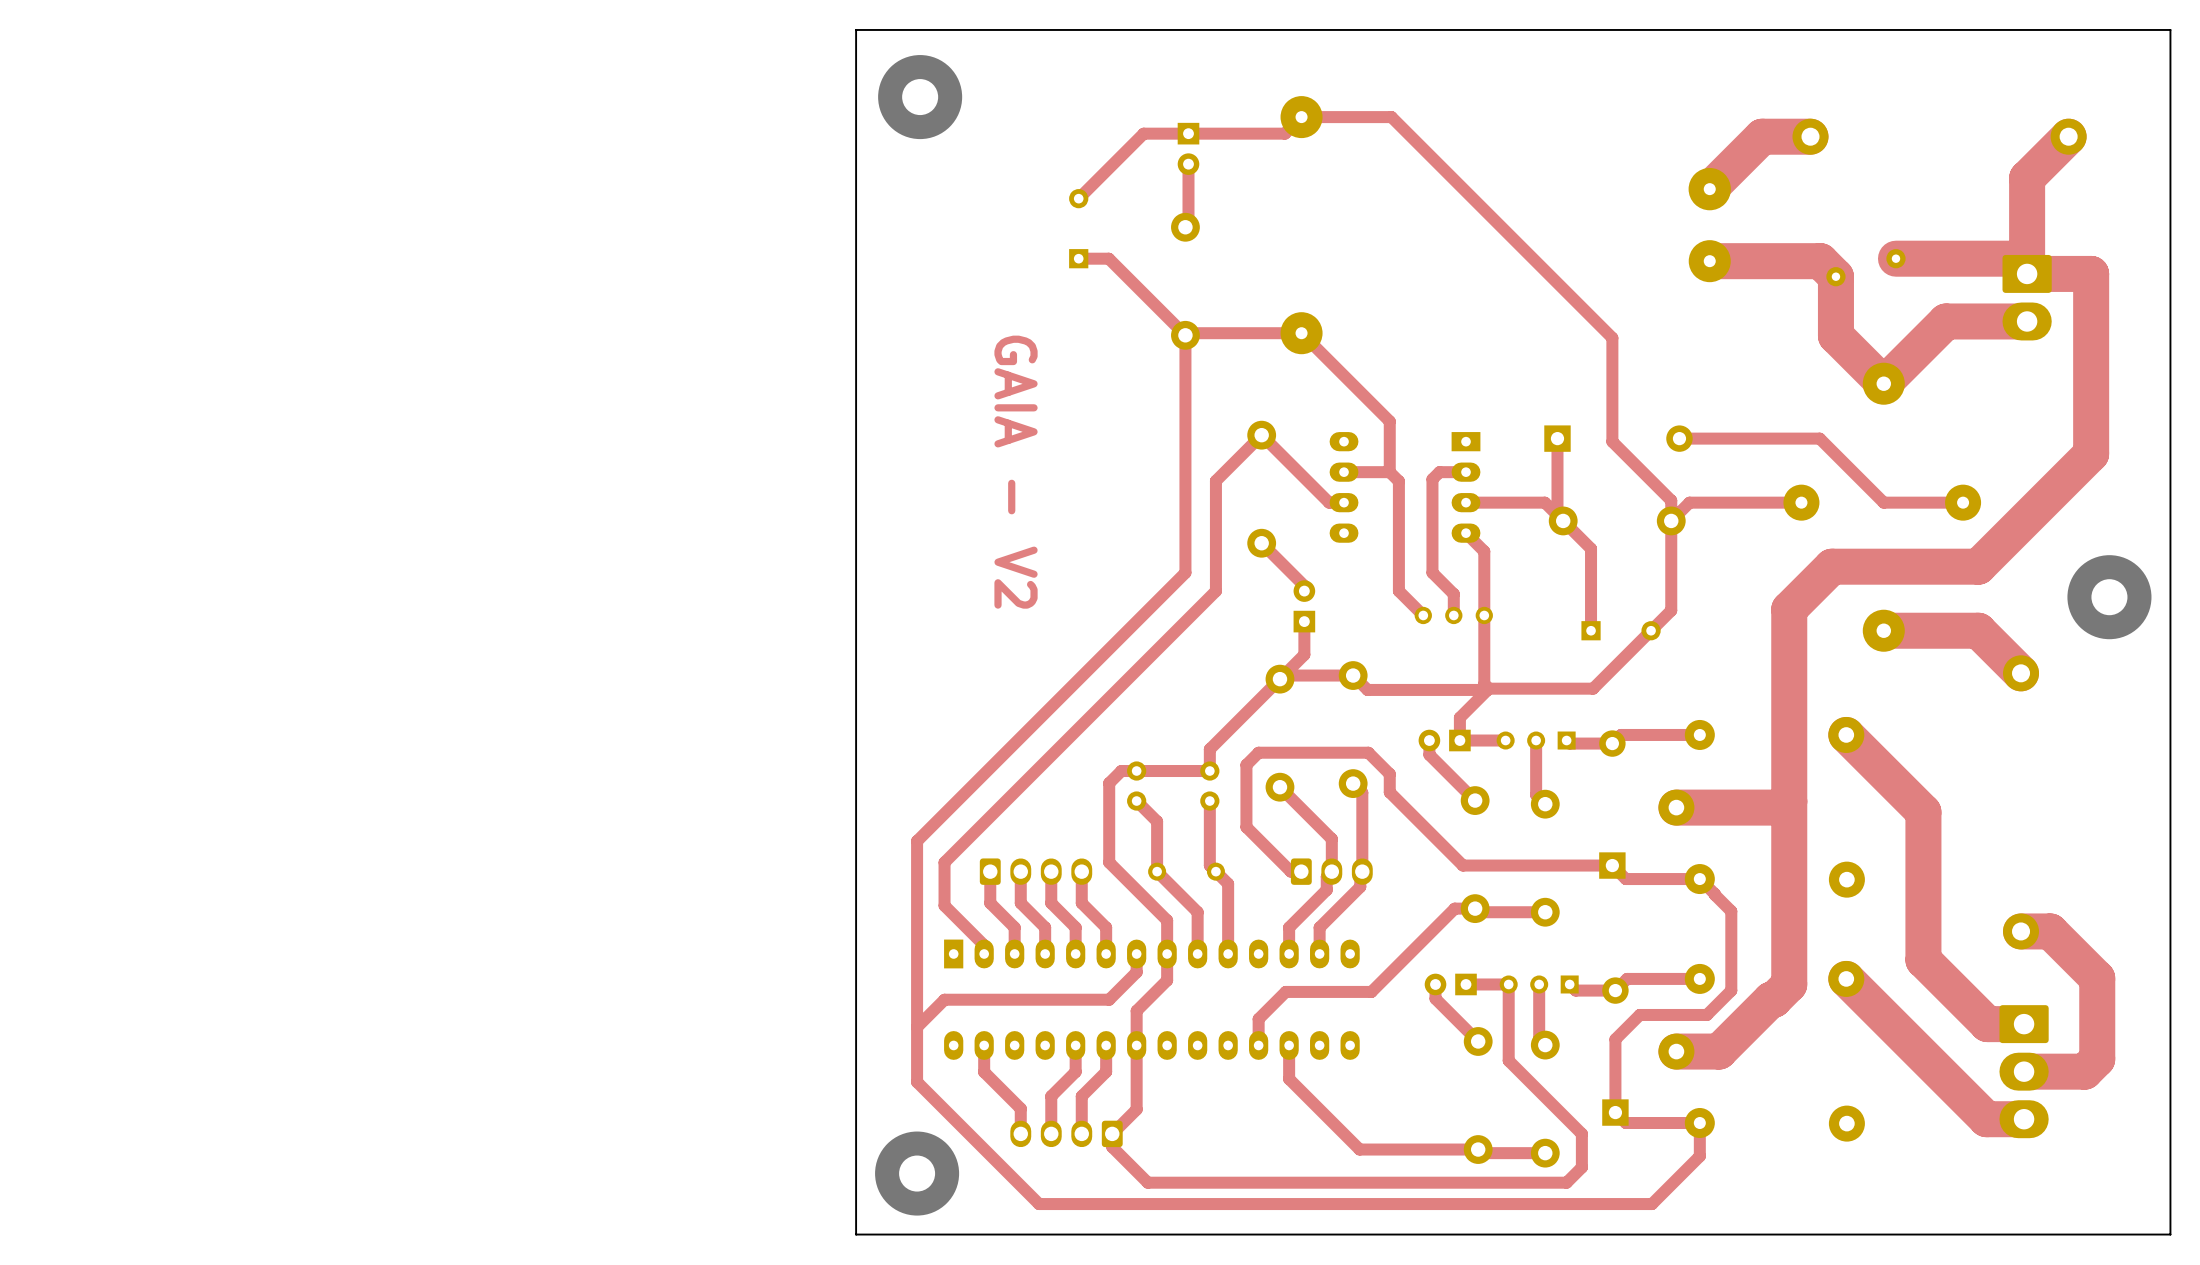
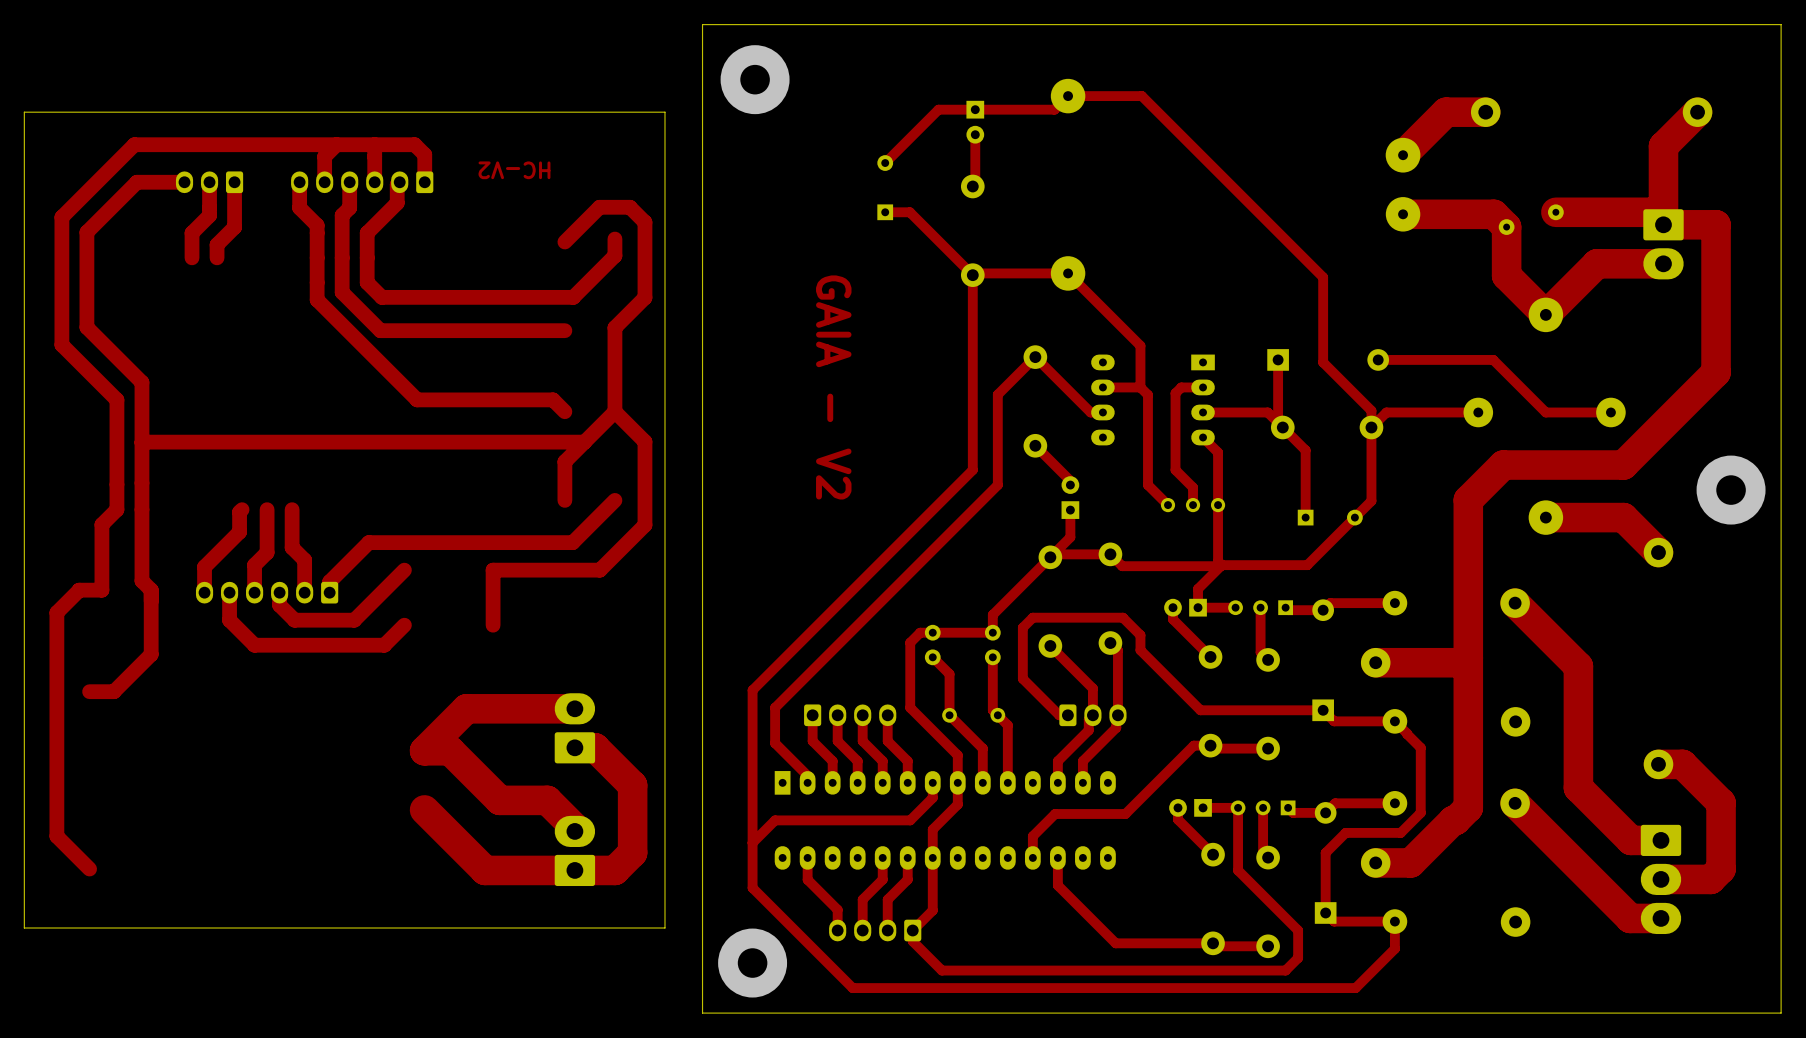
board edge: none -> (664, 112) (24, 112) (24, 928) (664, 928) (664, 112)
top track: none -> (336, 144) (324, 156) (324, 182)
top track: none -> (374, 144) (374, 182)
text: none -> HC-V2 (514, 170)
top track: none -> (184, 182) (136, 182) (86, 232) (86, 327) (141, 382) (141, 580) (151, 590) (151, 654) (113, 691) (89, 691)
top track: none -> (209, 182) (209, 215) (192, 233) (192, 257)
part: none -> (209, 182)
top track: none -> (234, 182) (234, 227) (217, 244) (217, 257)
top track: none -> (299, 182) (299, 207) (317, 225) (317, 299) (417, 399) (553, 399) (564, 411)
top track: none -> (349, 182) (349, 207) (342, 215) (342, 292) (380, 330) (564, 330)
part: none -> (362, 182)
top track: none -> (399, 182) (397, 184) (397, 203) (367, 233) (367, 282) (381, 297) (573, 297) (614, 255) (614, 239)
top track: none -> (424, 182) (424, 154) (414, 144) (134, 144) (61, 217) (61, 344) (116, 399) (116, 509) (101, 524) (101, 590) (79, 590)
top track: none -> (564, 242) (599, 207) (629, 207) (644, 222) (644, 297) (614, 327) (614, 411)
top track: none -> (614, 411) (564, 461) (564, 500)
top track: none -> (614, 411) (644, 441) (644, 525) (599, 570) (493, 570) (493, 625)
top track: none -> (584, 442) (141, 442)
top track: none -> (614, 500) (572, 542) (368, 542) (329, 581) (329, 592)
top track: none -> (242, 509) (239, 512) (239, 532) (204, 567) (204, 592)
top track: none -> (267, 509) (267, 552) (254, 565) (254, 592)
top track: none -> (292, 509) (292, 547) (304, 560) (304, 592)
top track: none -> (404, 570) (354, 620) (294, 620) (279, 605) (279, 592)
top track: none -> (79, 590) (56, 612) (56, 836) (89, 869)
top track: none -> (229, 592) (229, 620) (254, 645) (384, 645) (404, 625)
part: none -> (267, 592)
top track: none -> (574, 708) (466, 708) (424, 750) (450, 750) (499, 800) (547, 800) (574, 827) (574, 831)
part: none -> (574, 728)
top track: none -> (574, 747) (595, 747) (632, 785) (632, 852) (614, 870) (485, 870) (424, 809)
part: none -> (574, 850)

